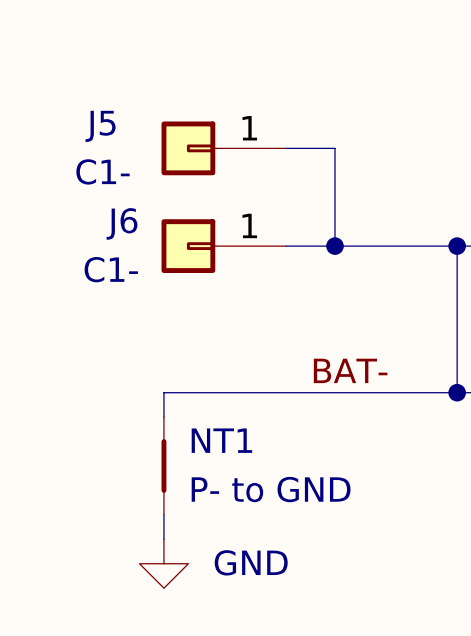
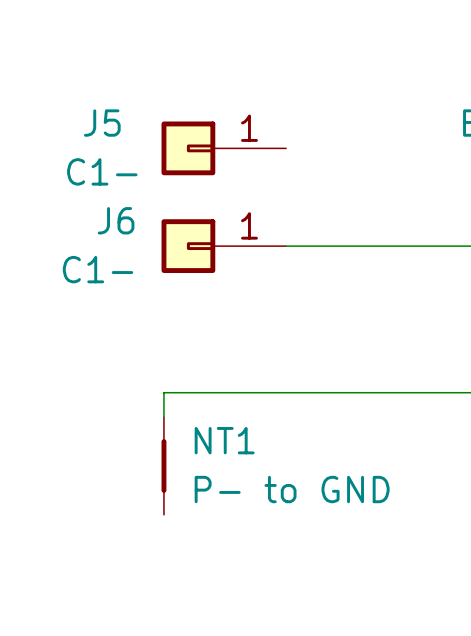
wire: (286, 148) (334, 148) (334, 246) -> none
junction: (334, 246) -> none
wire: (457, 246) (457, 392) -> none
junction: (457, 246) -> none
label: BAT- (350, 370) -> none
junction: (457, 392) -> none
wire: (163, 514) (163, 539) -> none
power symbol: GND (163, 563) -> none

